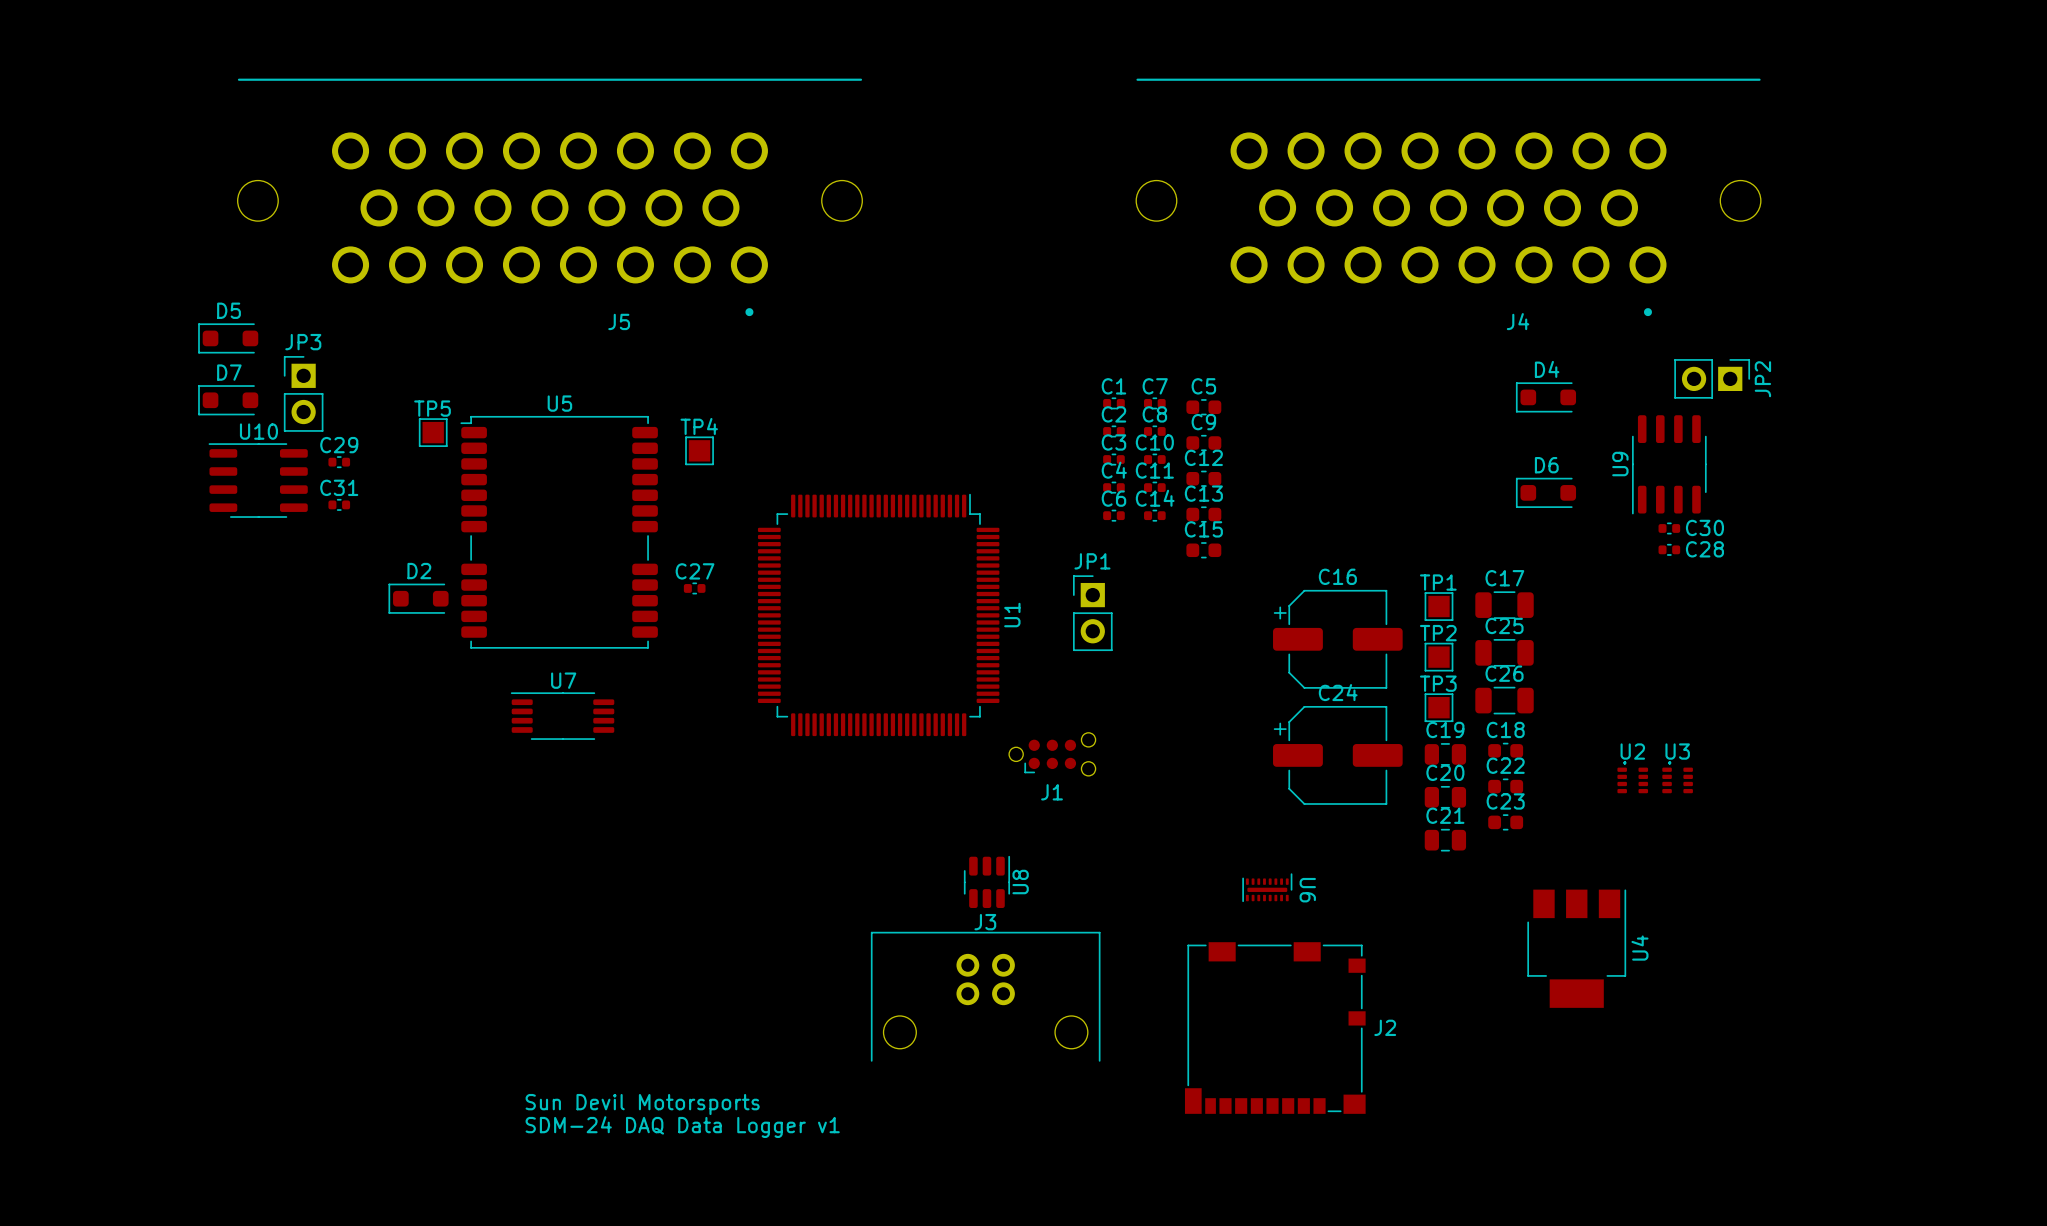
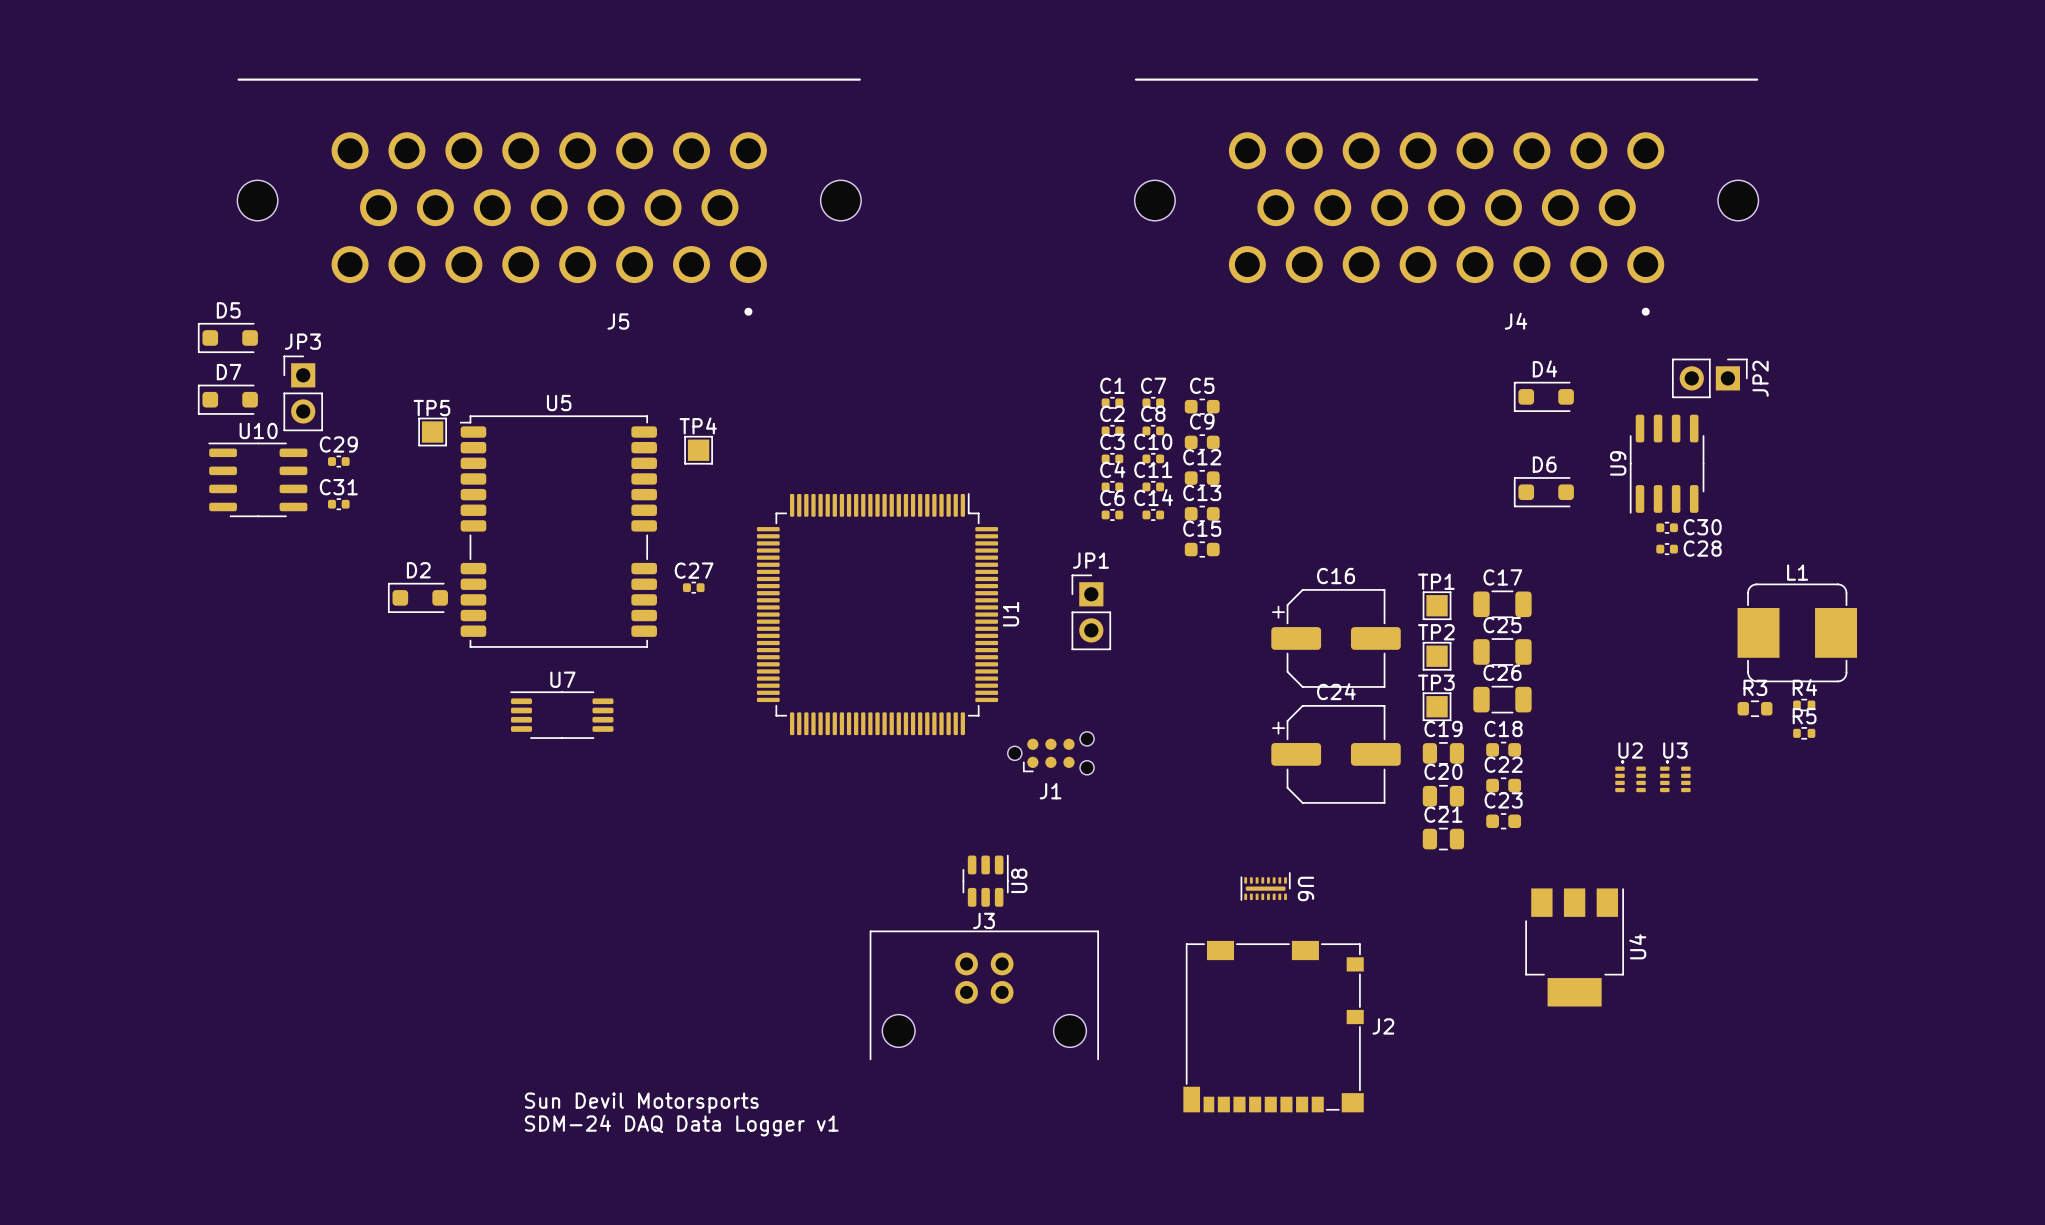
L1: none -> (1797, 632)
R4: none -> (1804, 705)
R3: none -> (1755, 708)
R5: none -> (1804, 733)

